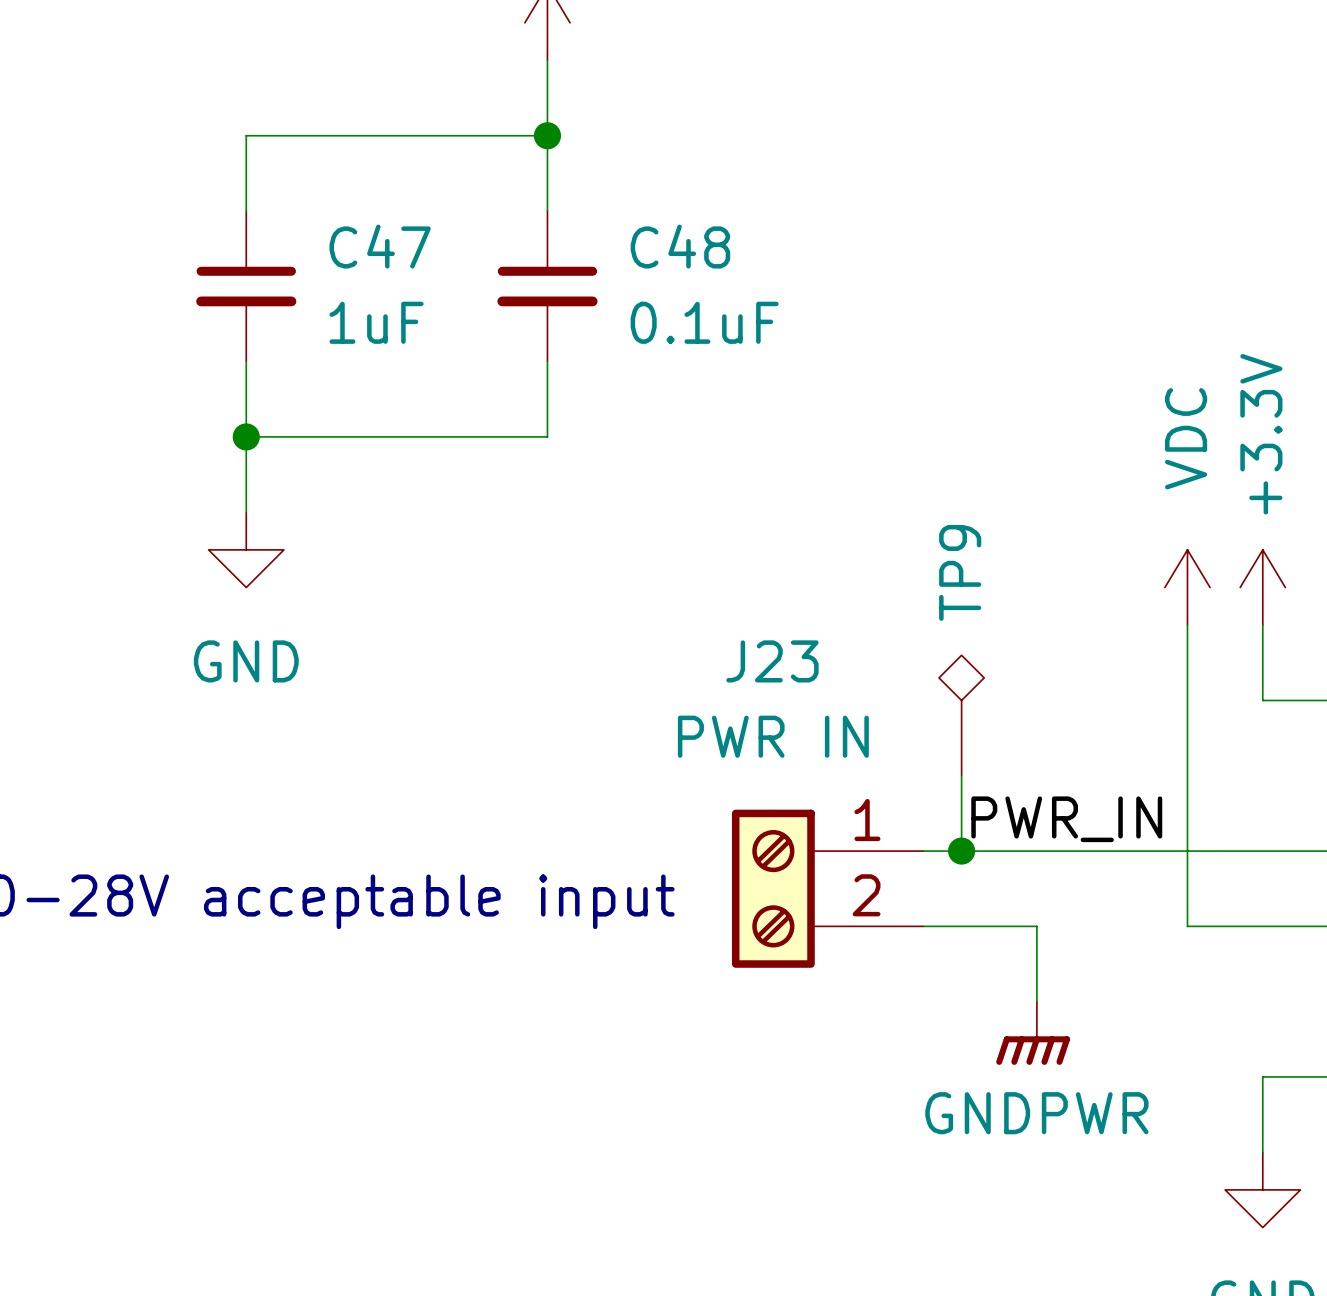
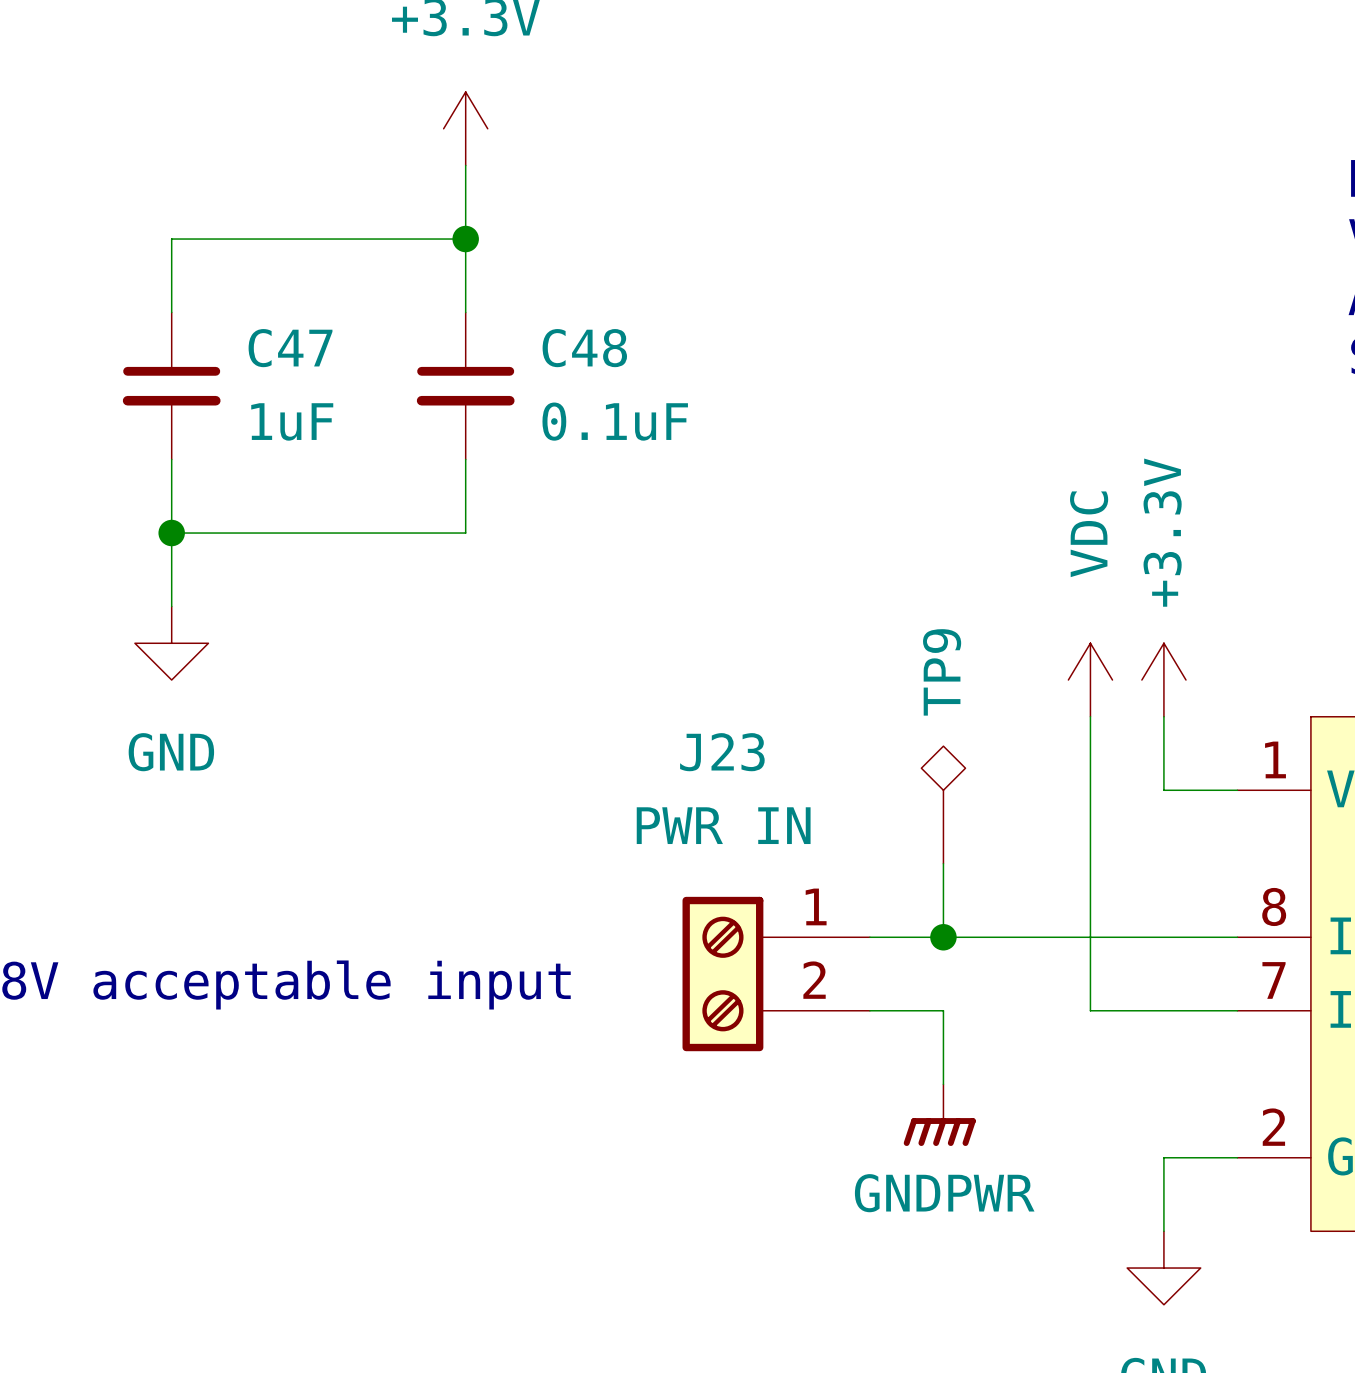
TP9 position: (961, 715) -> (943, 804)
wire: (961, 775) (961, 851) (923, 851) -> none
wire: none -> (943, 863) (943, 937)
label: PWR_IN (1066, 819) -> none
junction position: (961, 851) -> (943, 937)
J23 position: (827, 888) -> (776, 974)

